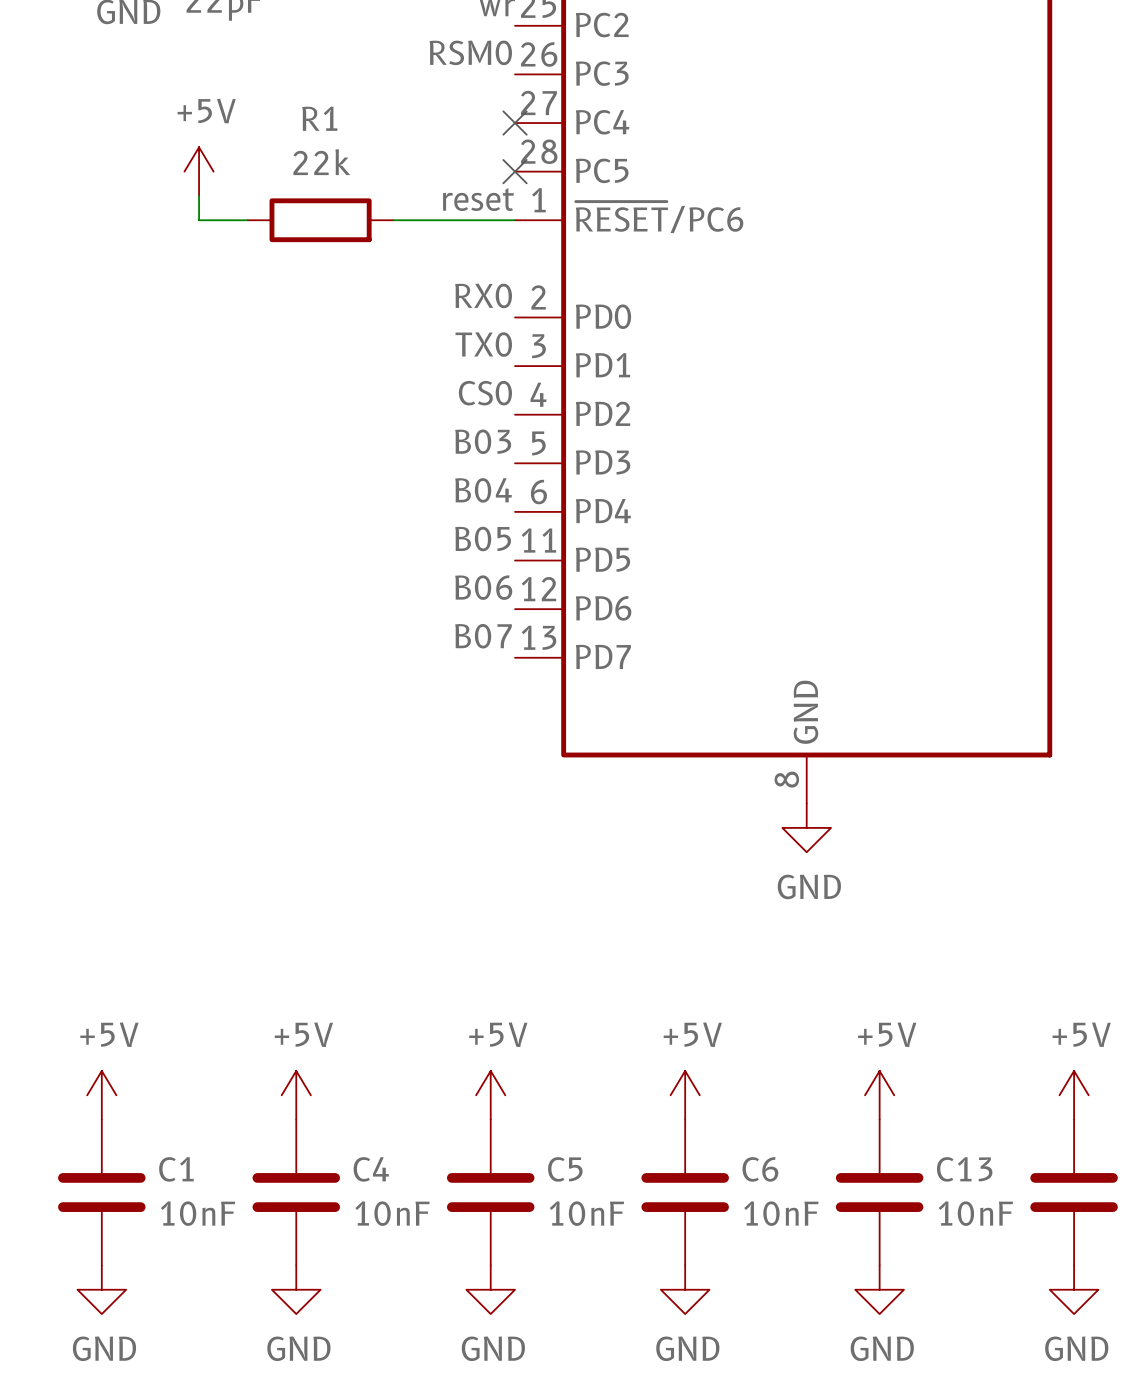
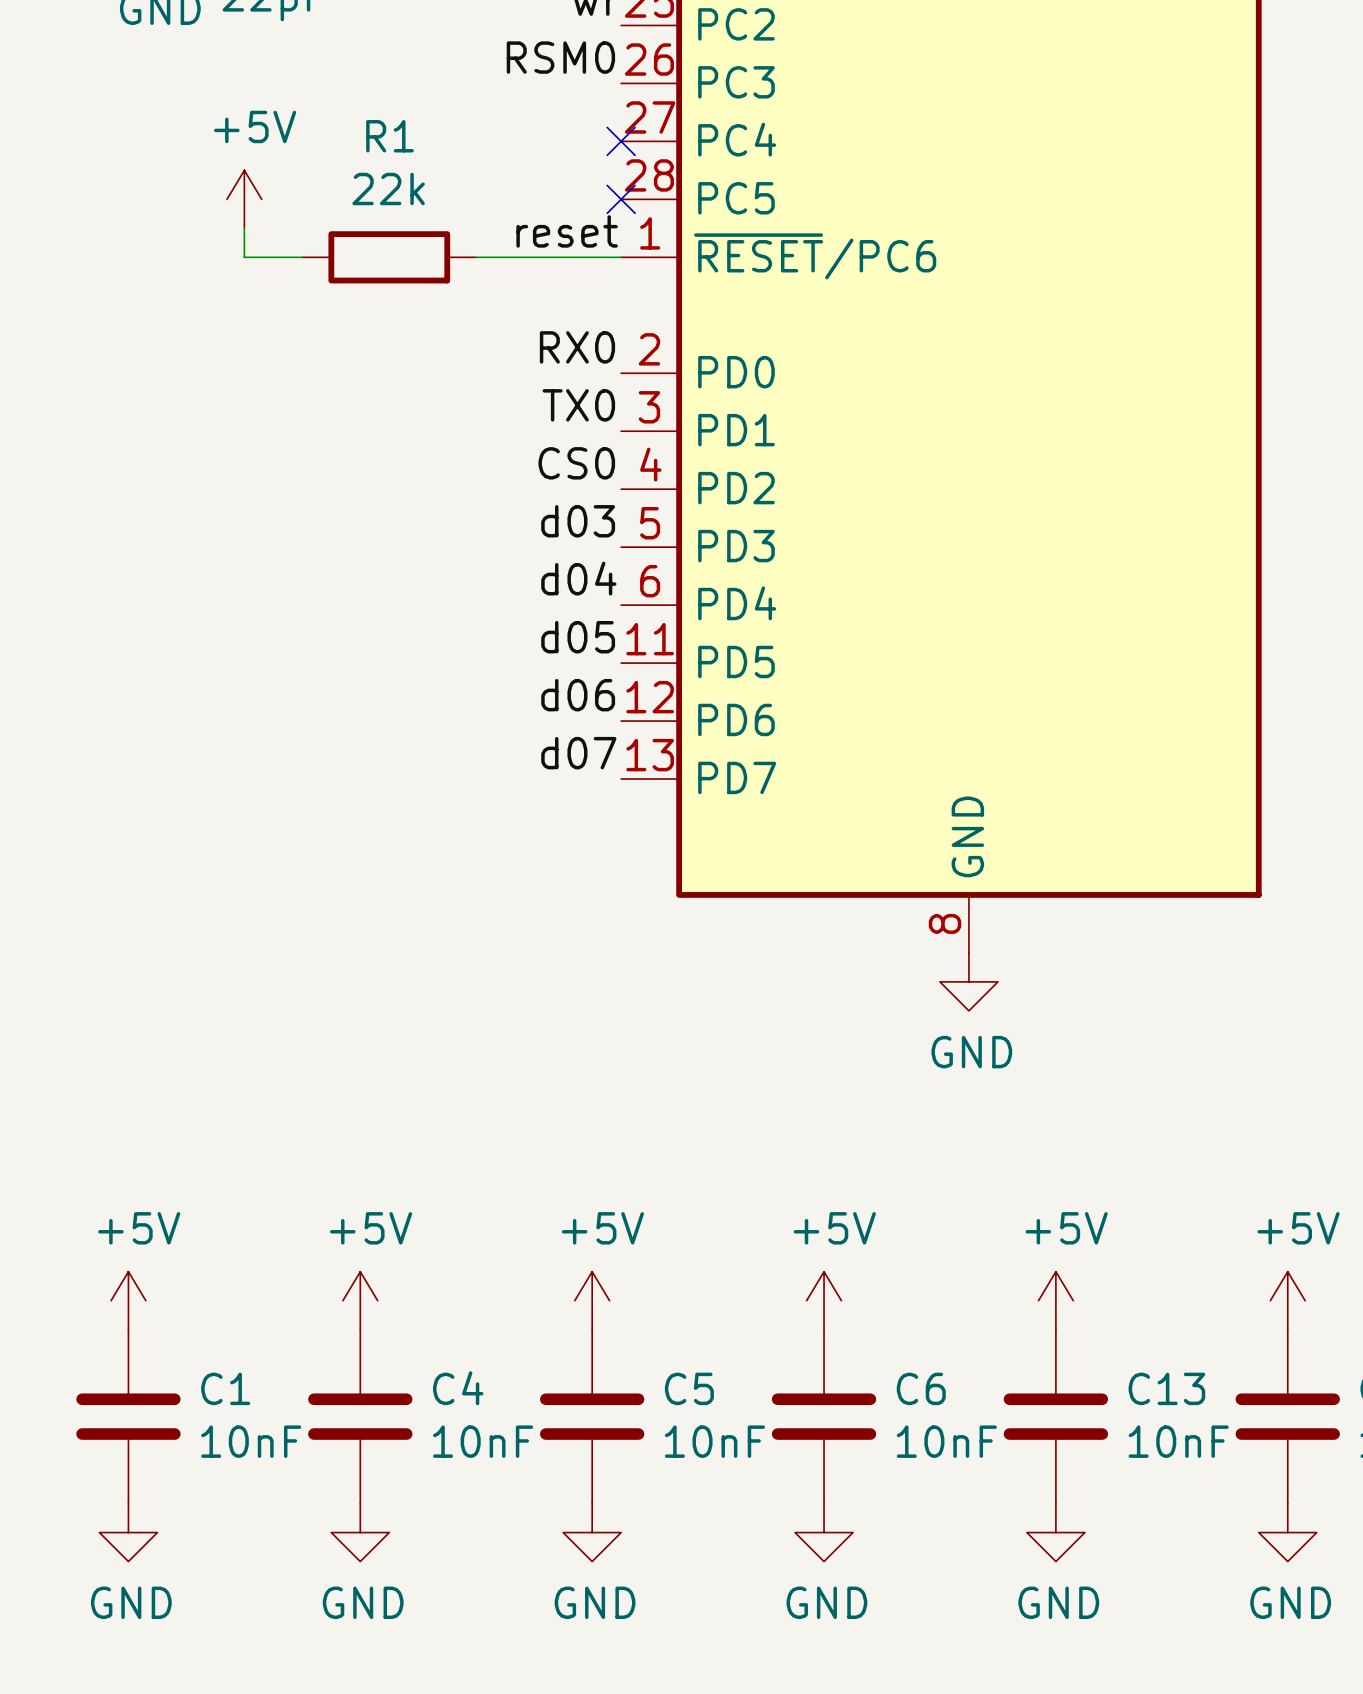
label: B03 (483, 441) -> d03 (578, 521)
label: B04 (483, 490) -> d04 (578, 578)
label: B05 (483, 539) -> d05 (578, 637)
label: B06 (483, 587) -> d06 (578, 695)
label: B07 (483, 636) -> d07 (578, 753)

